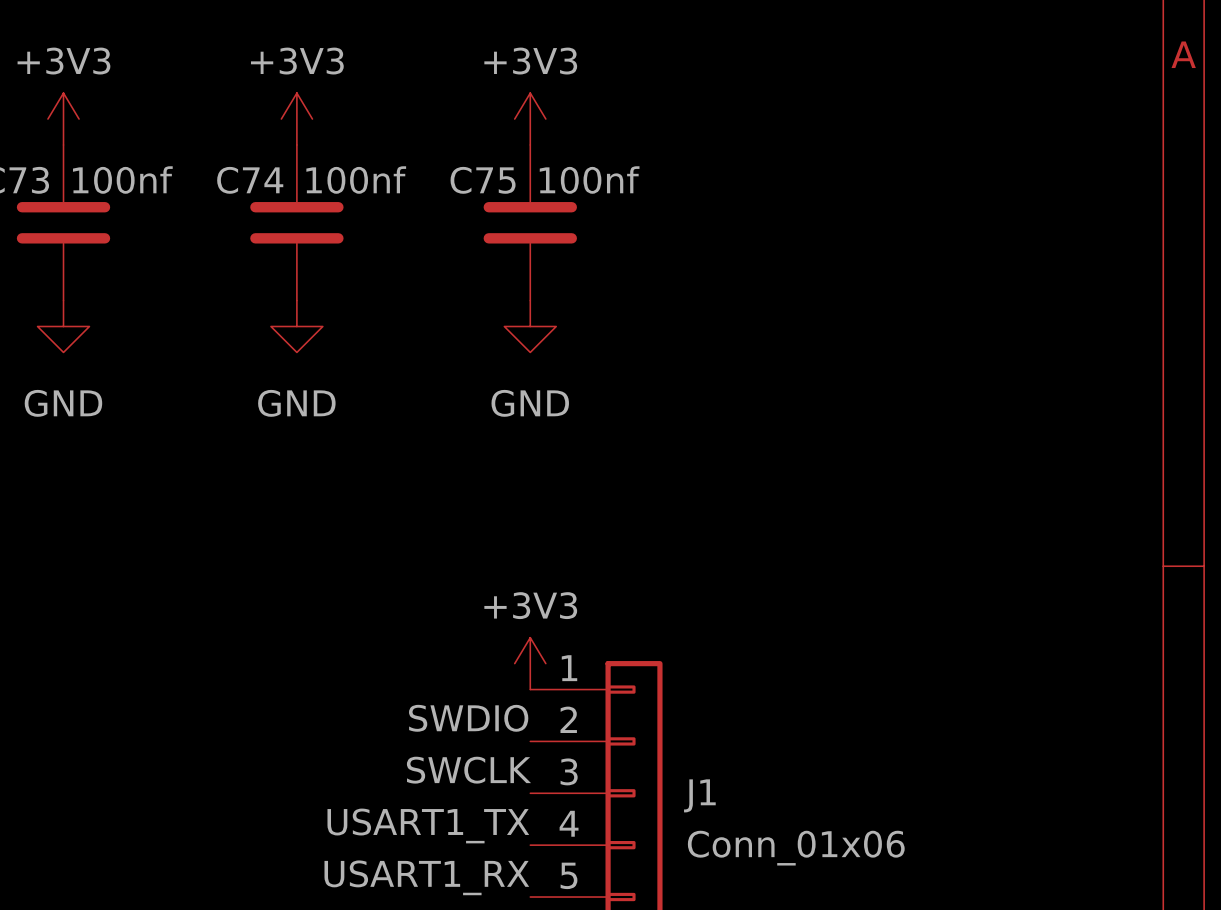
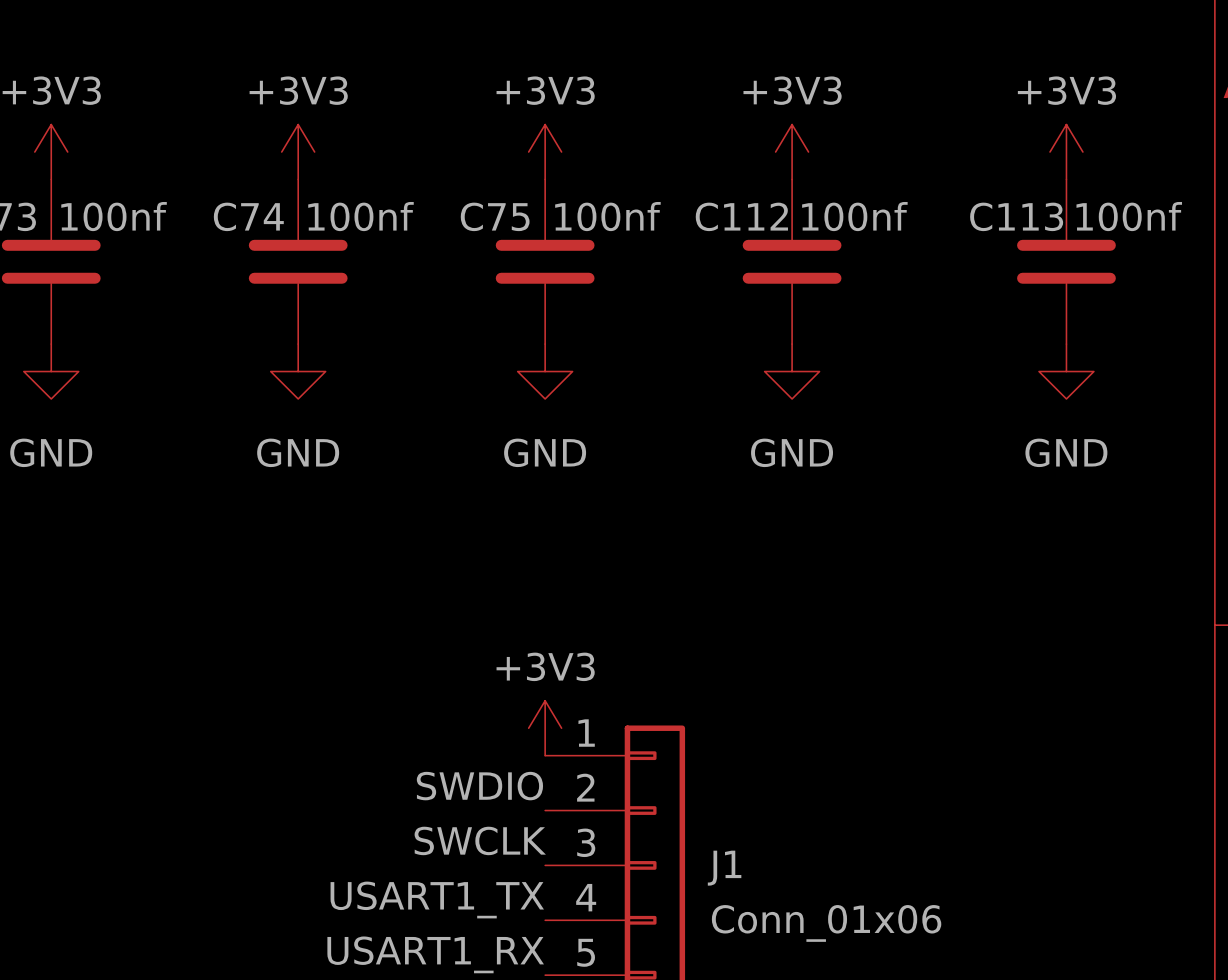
power symbol: none -> +3V3 (792, 152)
power symbol: none -> +3V3 (1066, 152)
C112: none -> 100nf (792, 261)
C113: none -> 100nf (1066, 261)
power symbol: none -> GND (792, 371)
power symbol: none -> GND (1066, 371)

